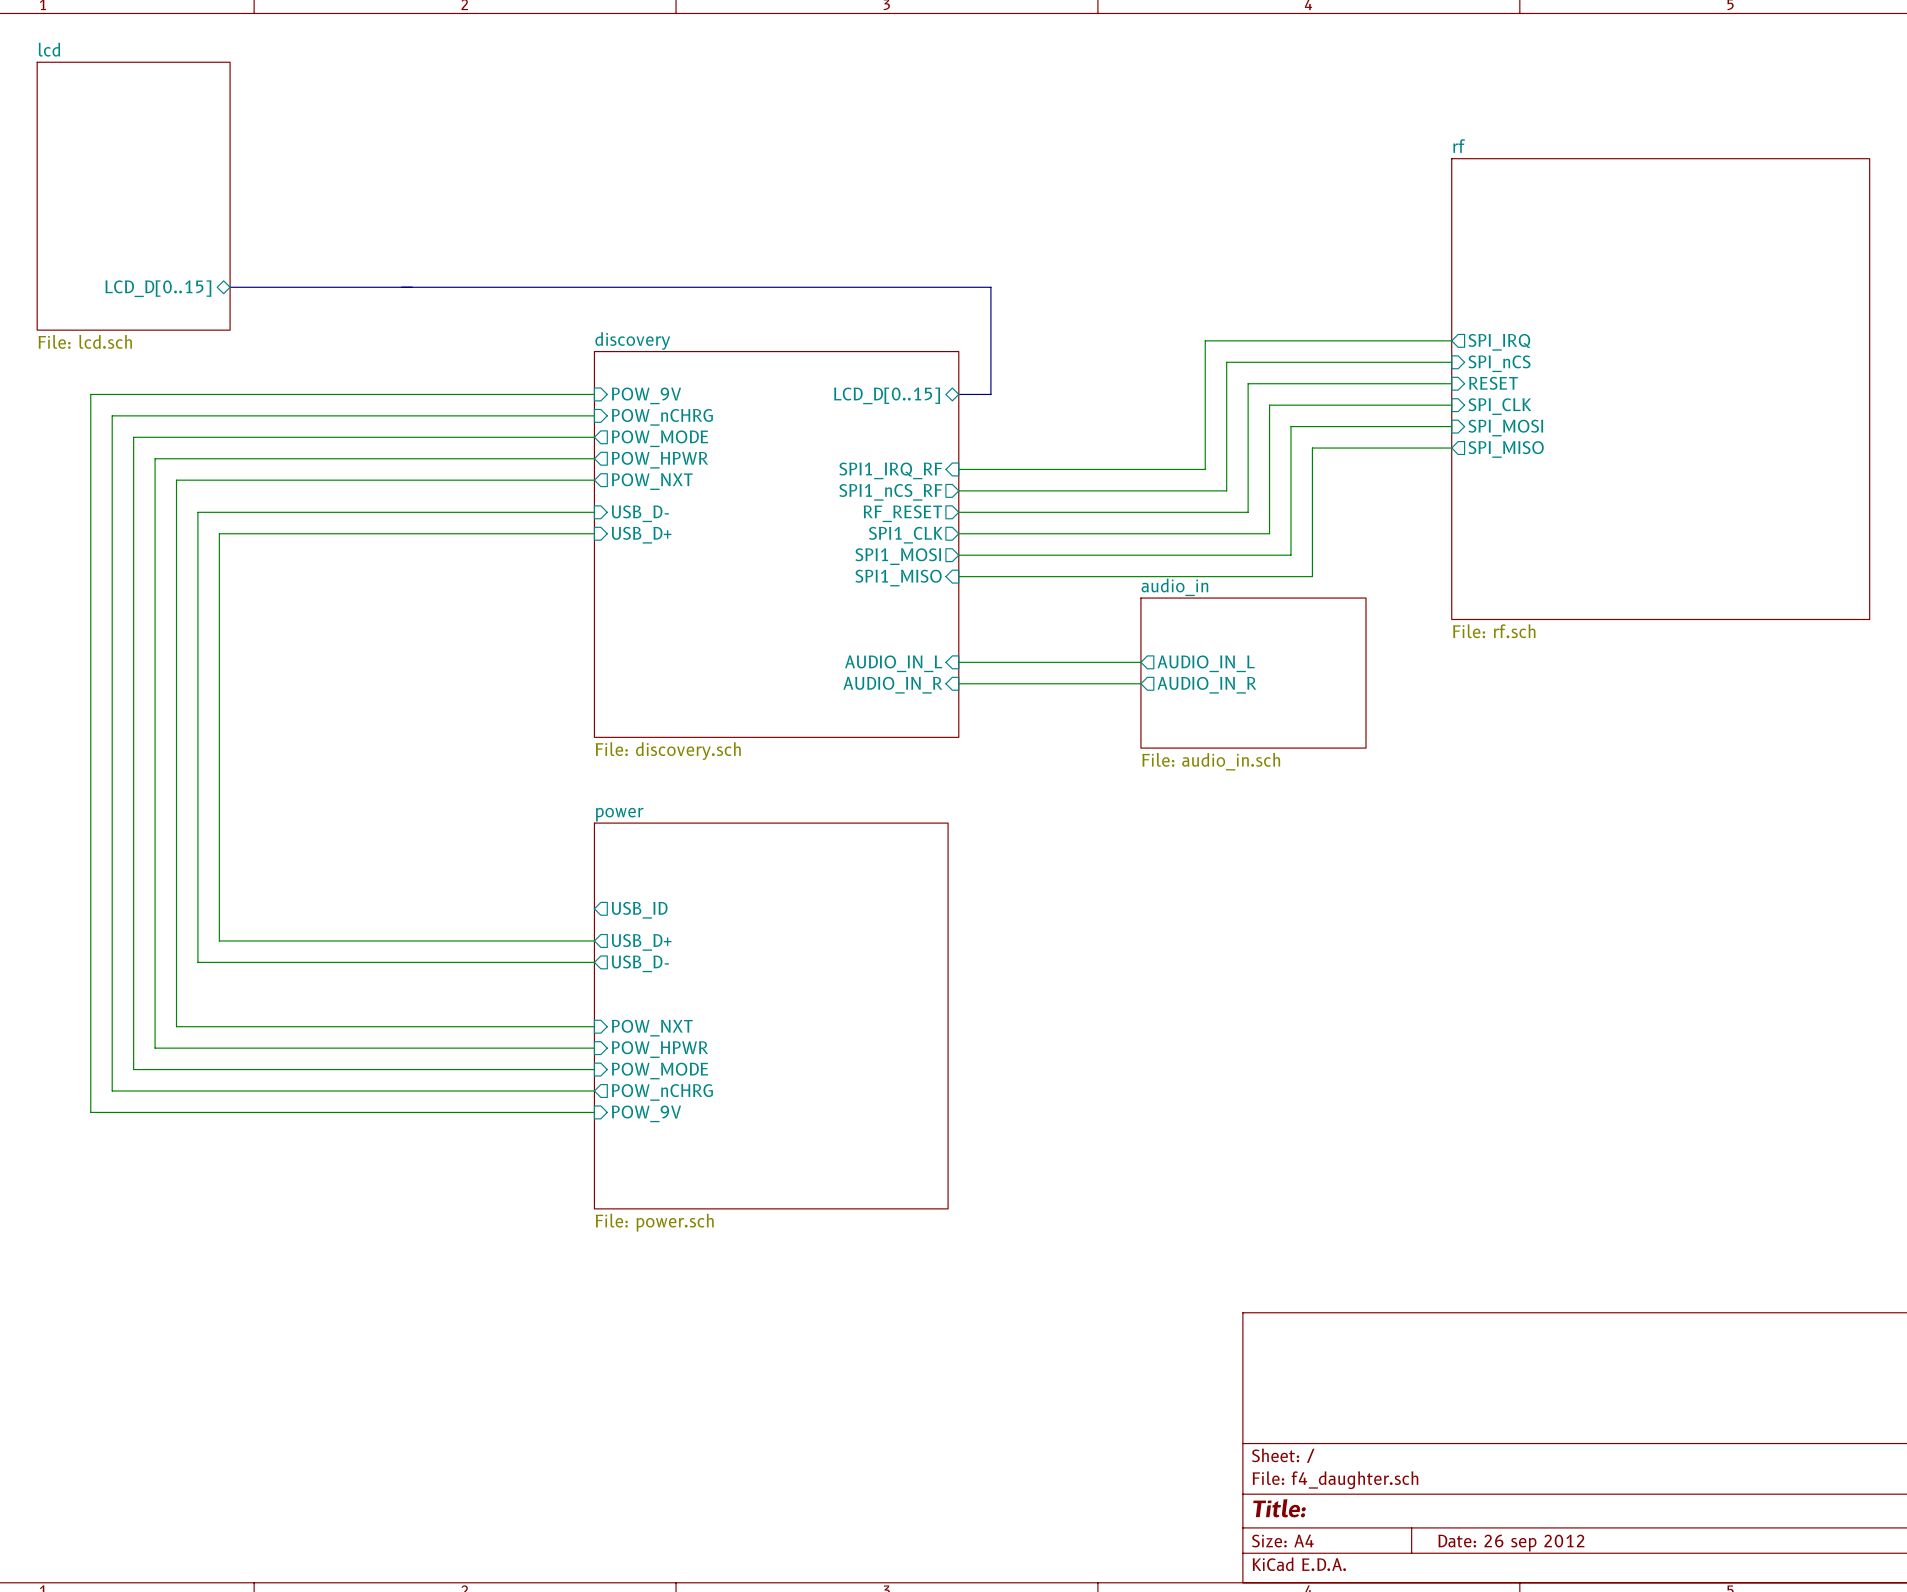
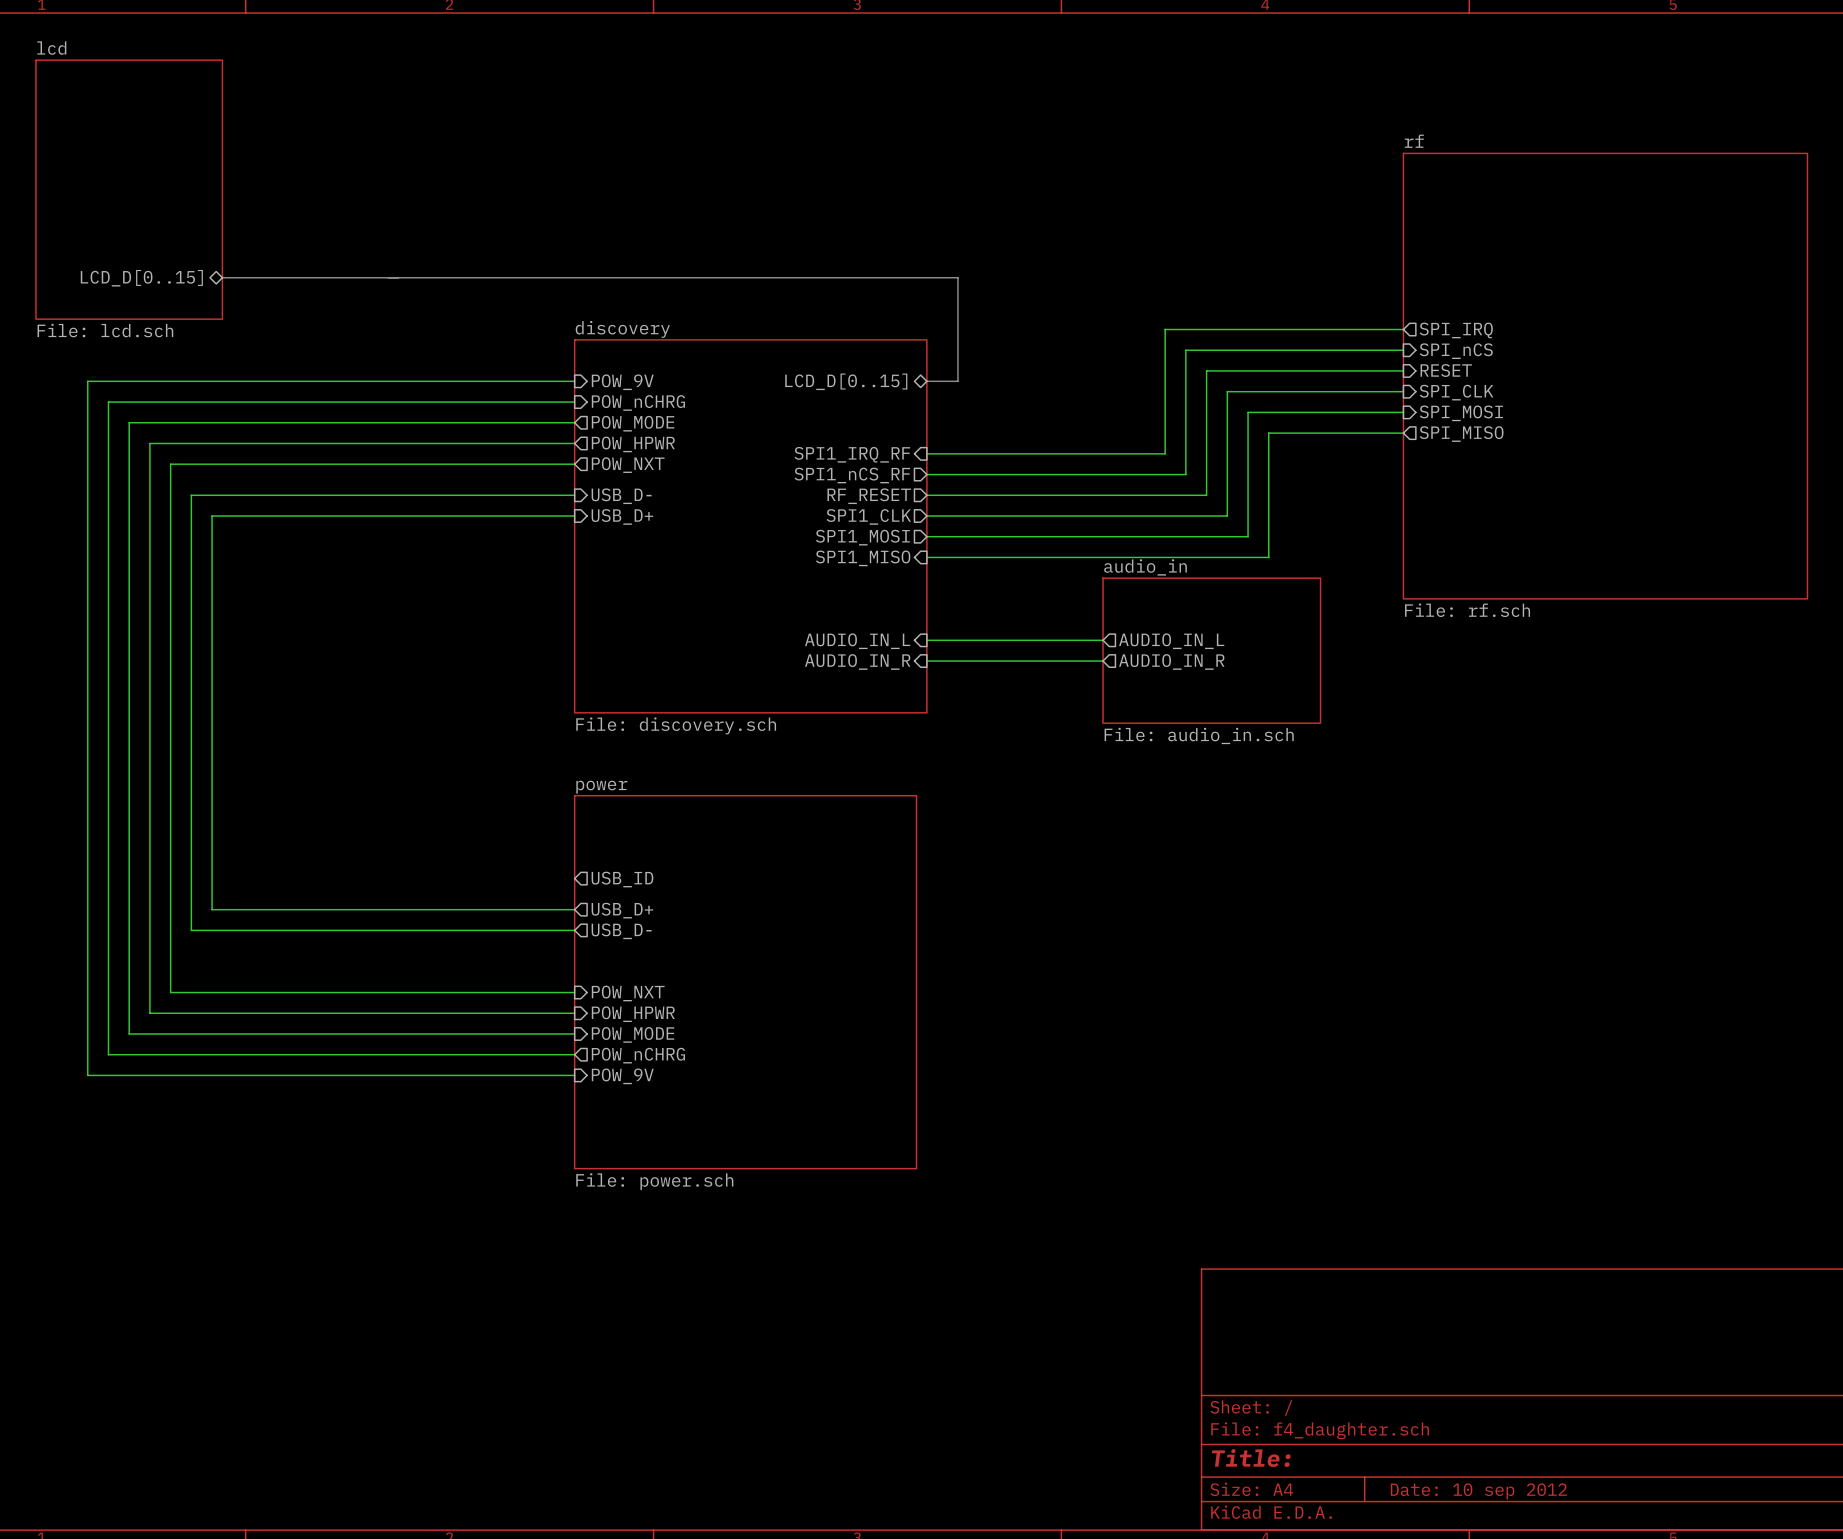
title block: Date: 26 sep 2012 (1511, 1543) -> Date: 10 sep 2012 (1478, 1491)

